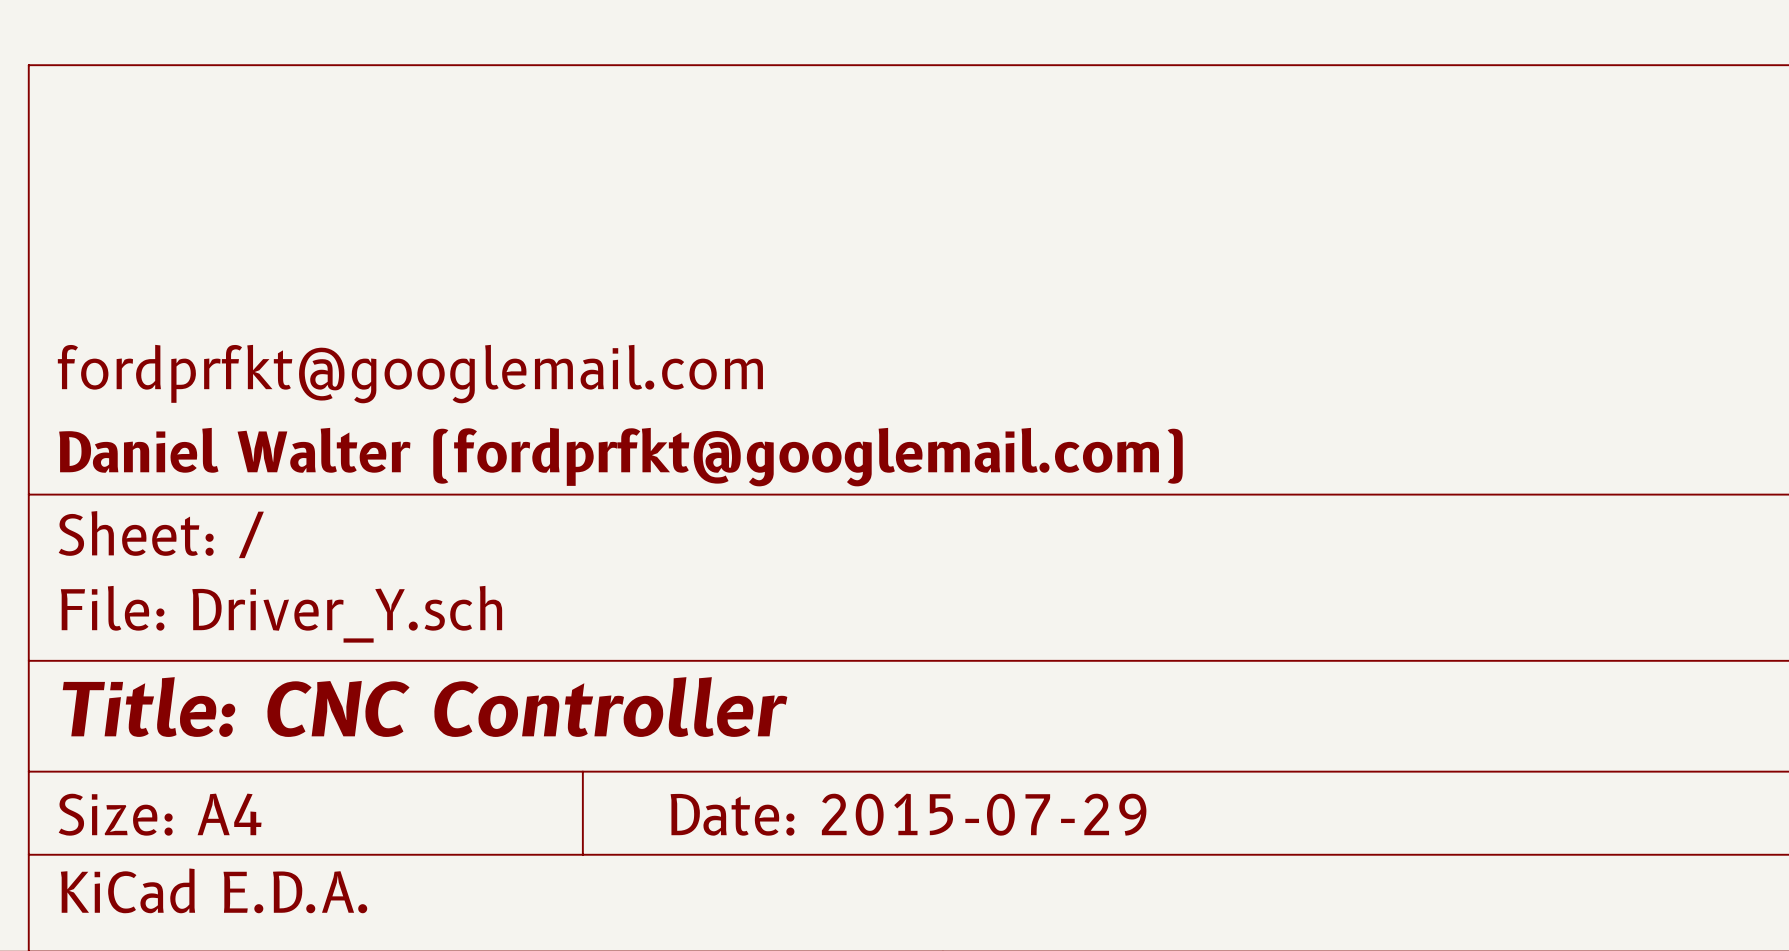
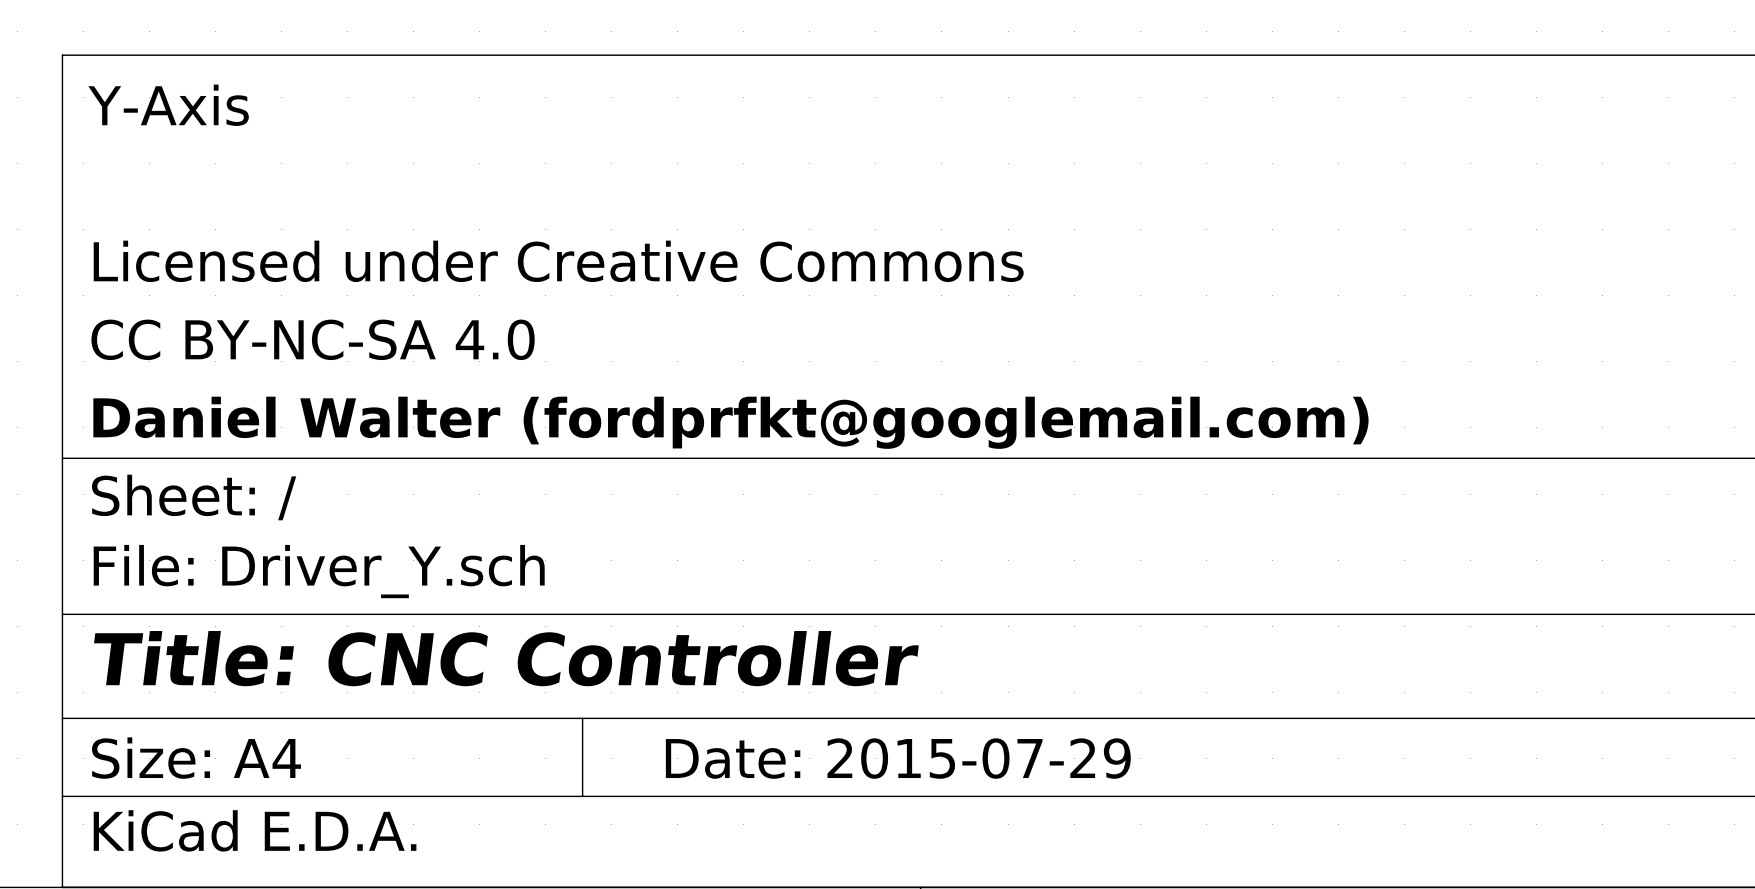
title block: none -> Y-Axis (168, 105)
title block: none -> Licensed under Creative Commons (558, 261)
title block: fordprfkt@googlemail.com (410, 374) -> CC BY-NC-SA 4.0 (313, 339)

